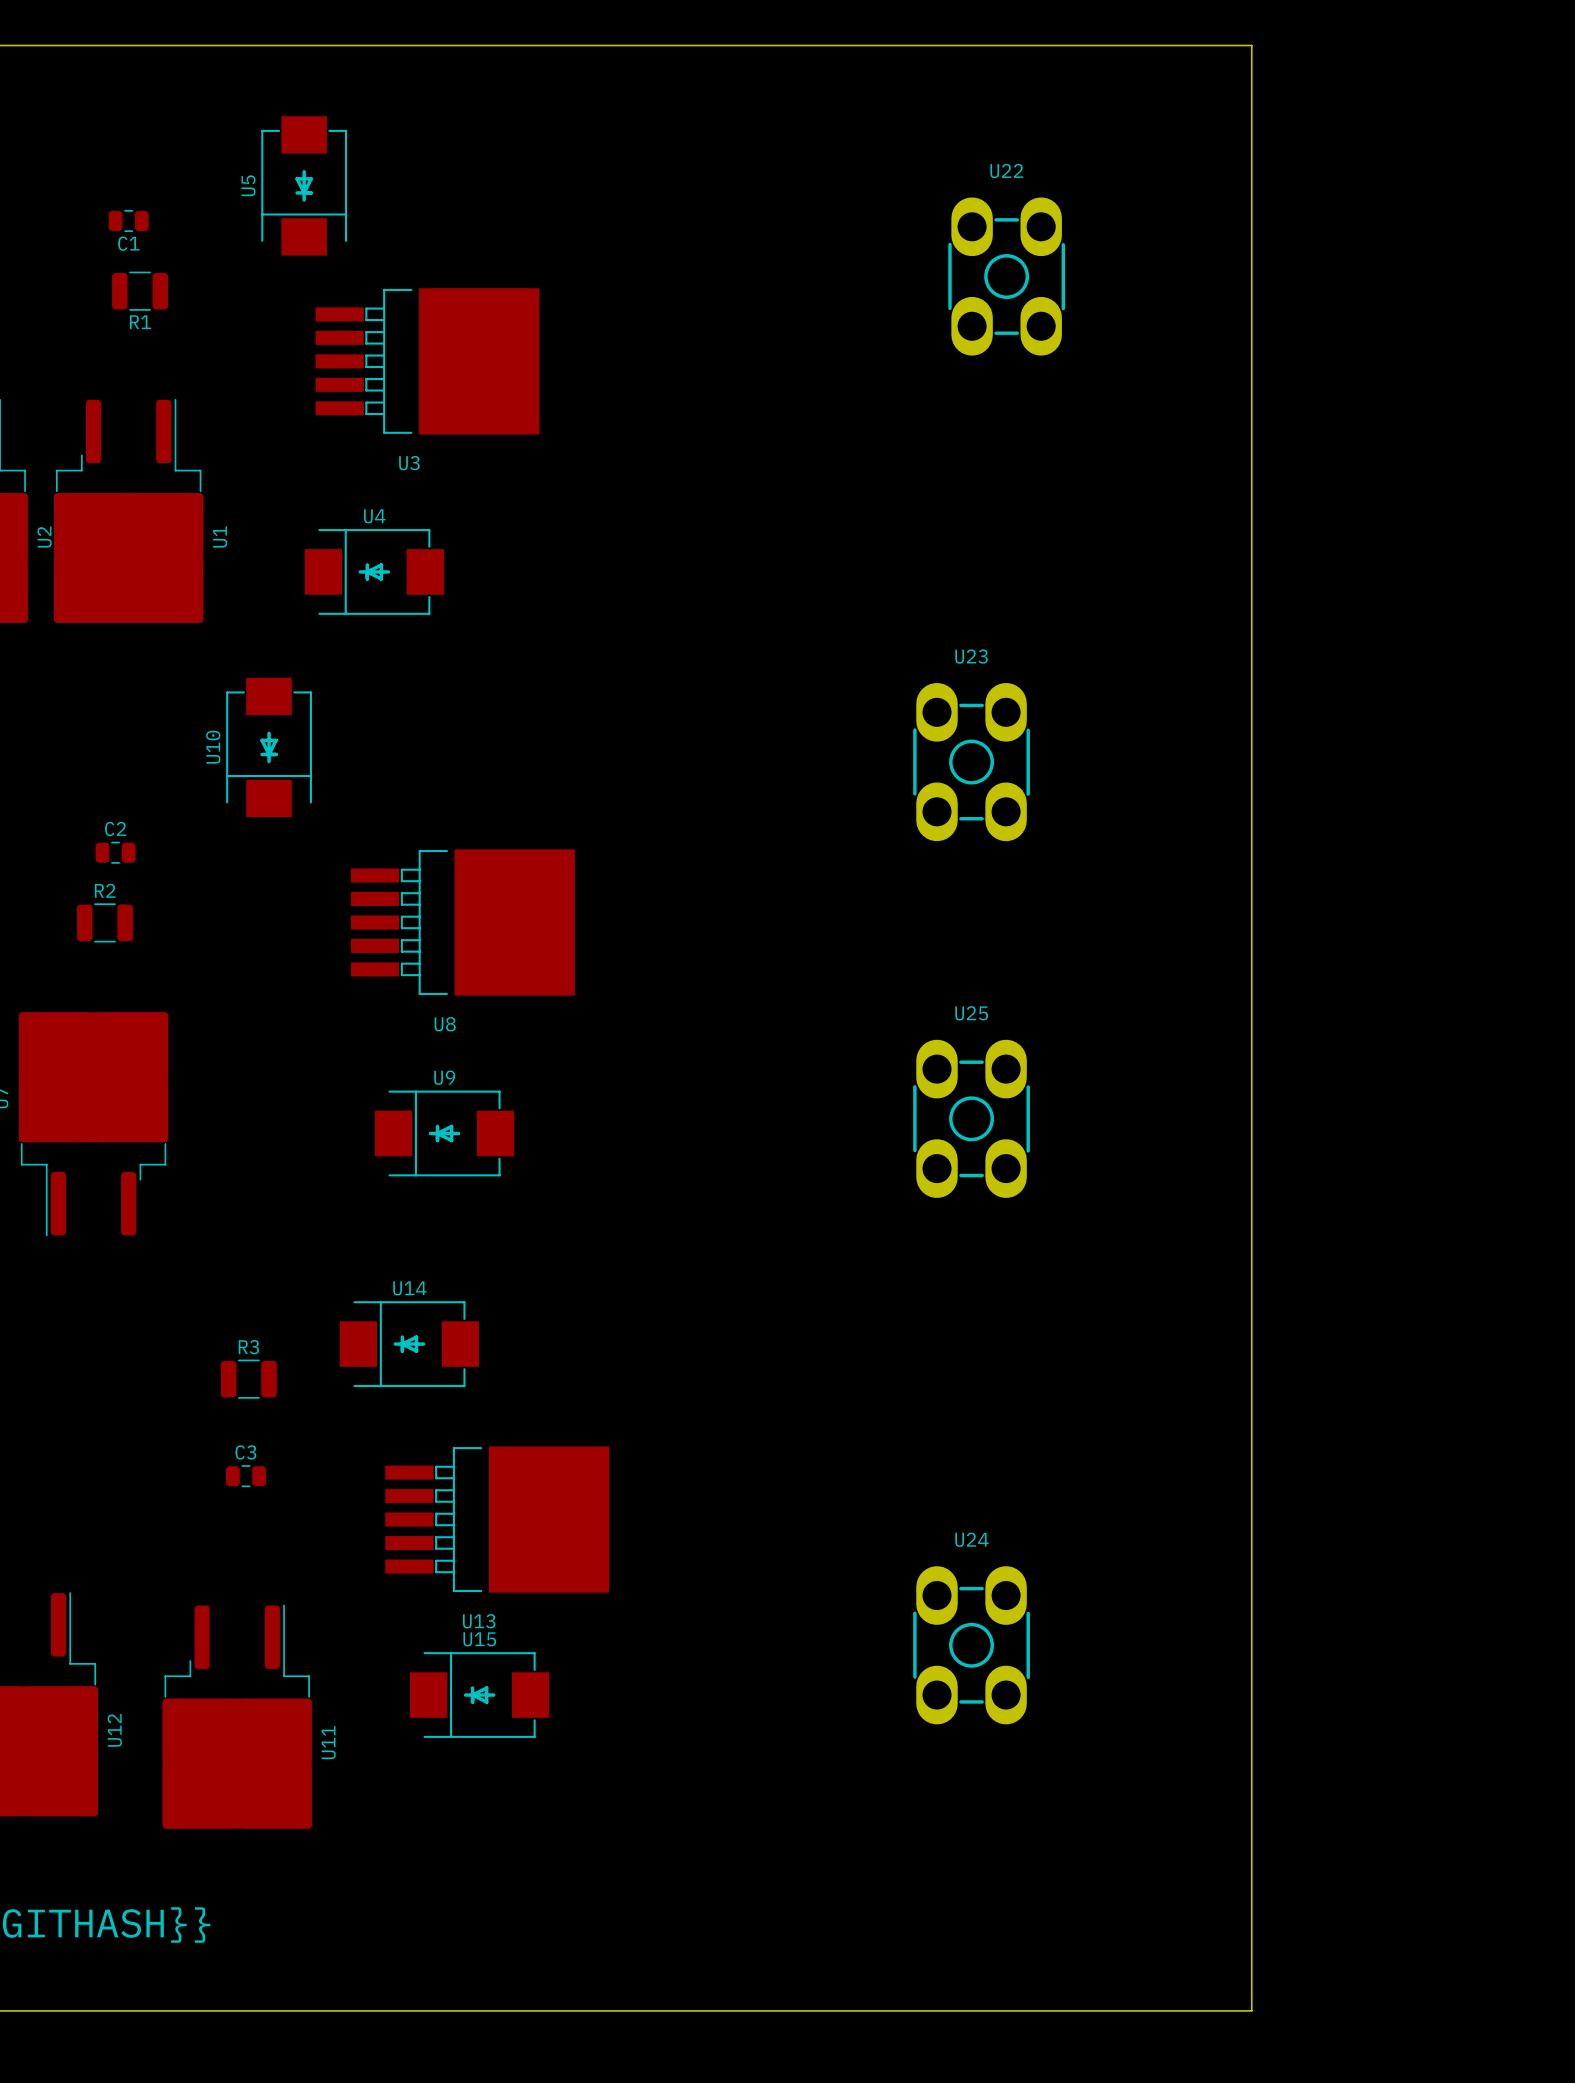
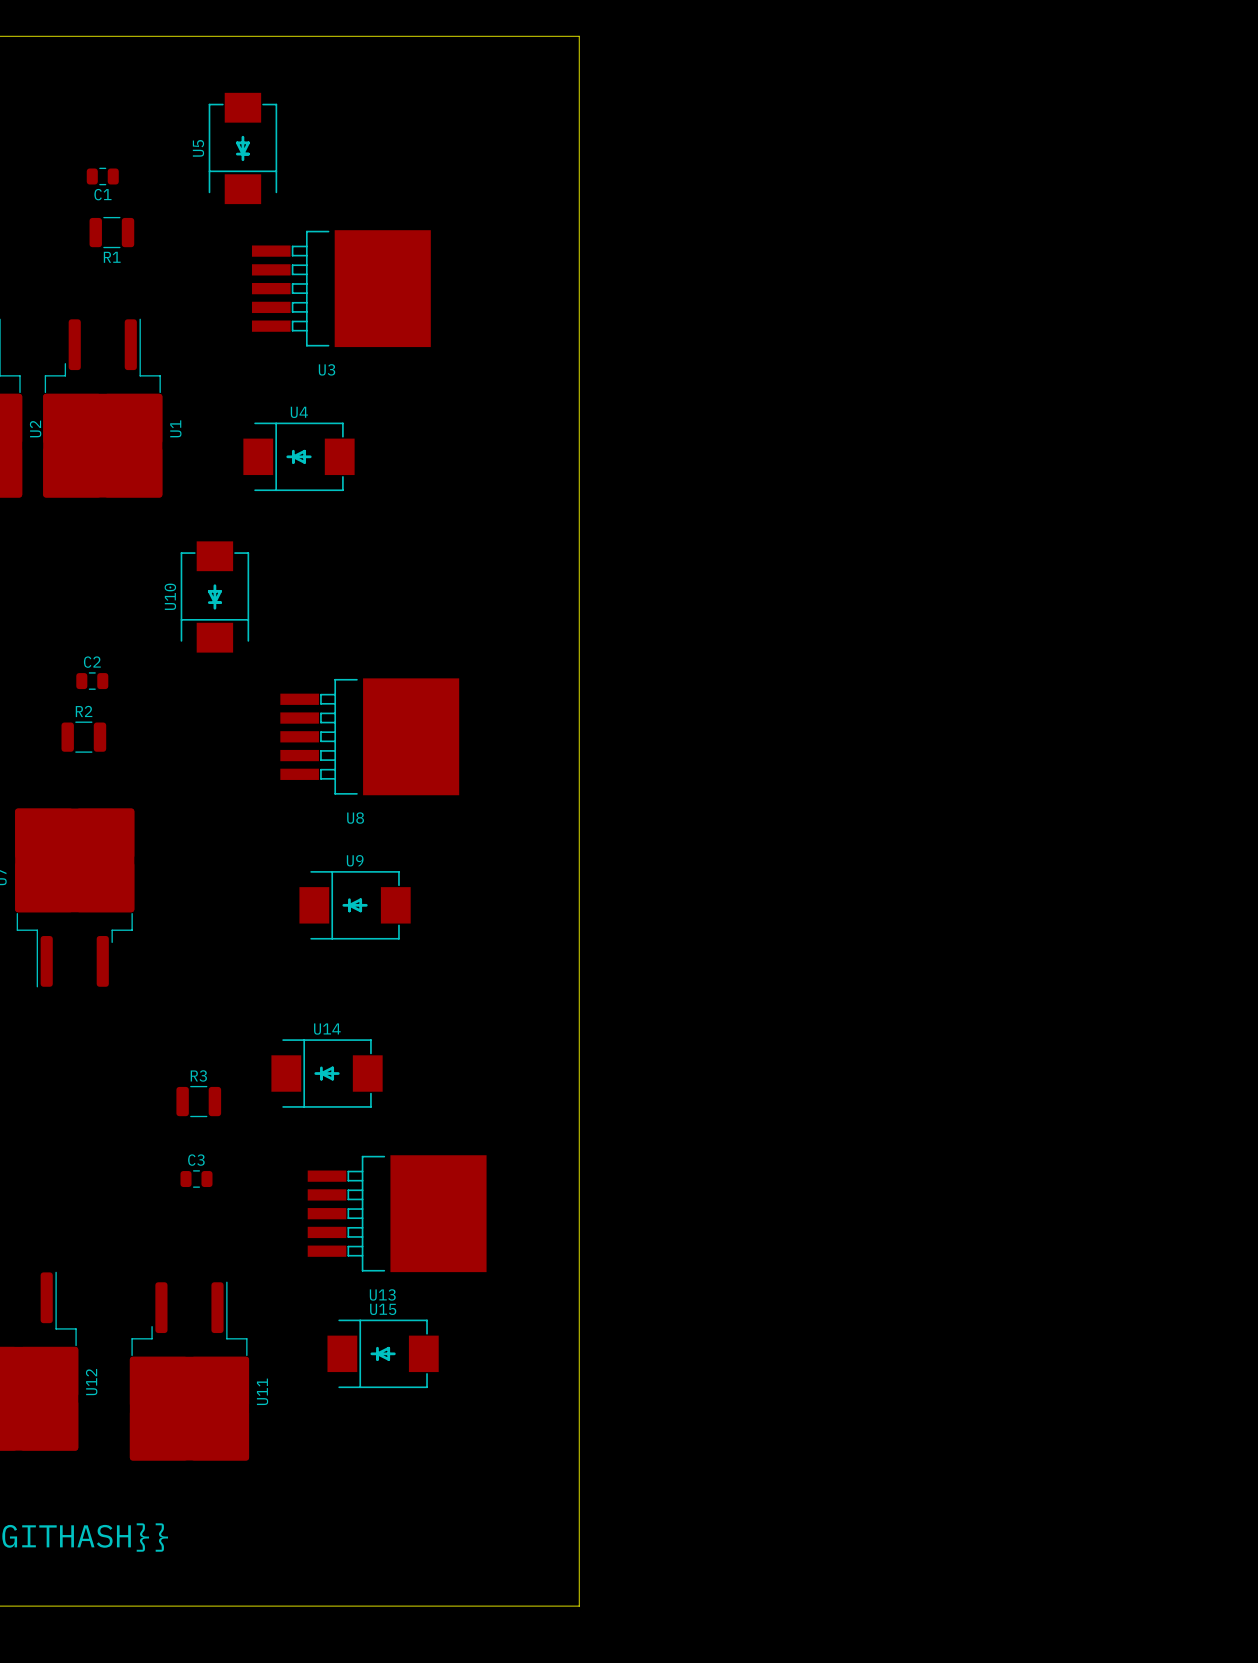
board edge: (725, 45) (1251, 45) (1251, 2010) (725, 2010) -> (579, 36) (579, 1606)
U22: (1006, 276) -> none
U23: (971, 762) -> none
U25: (971, 1118) -> none
U24: (971, 1645) -> none

